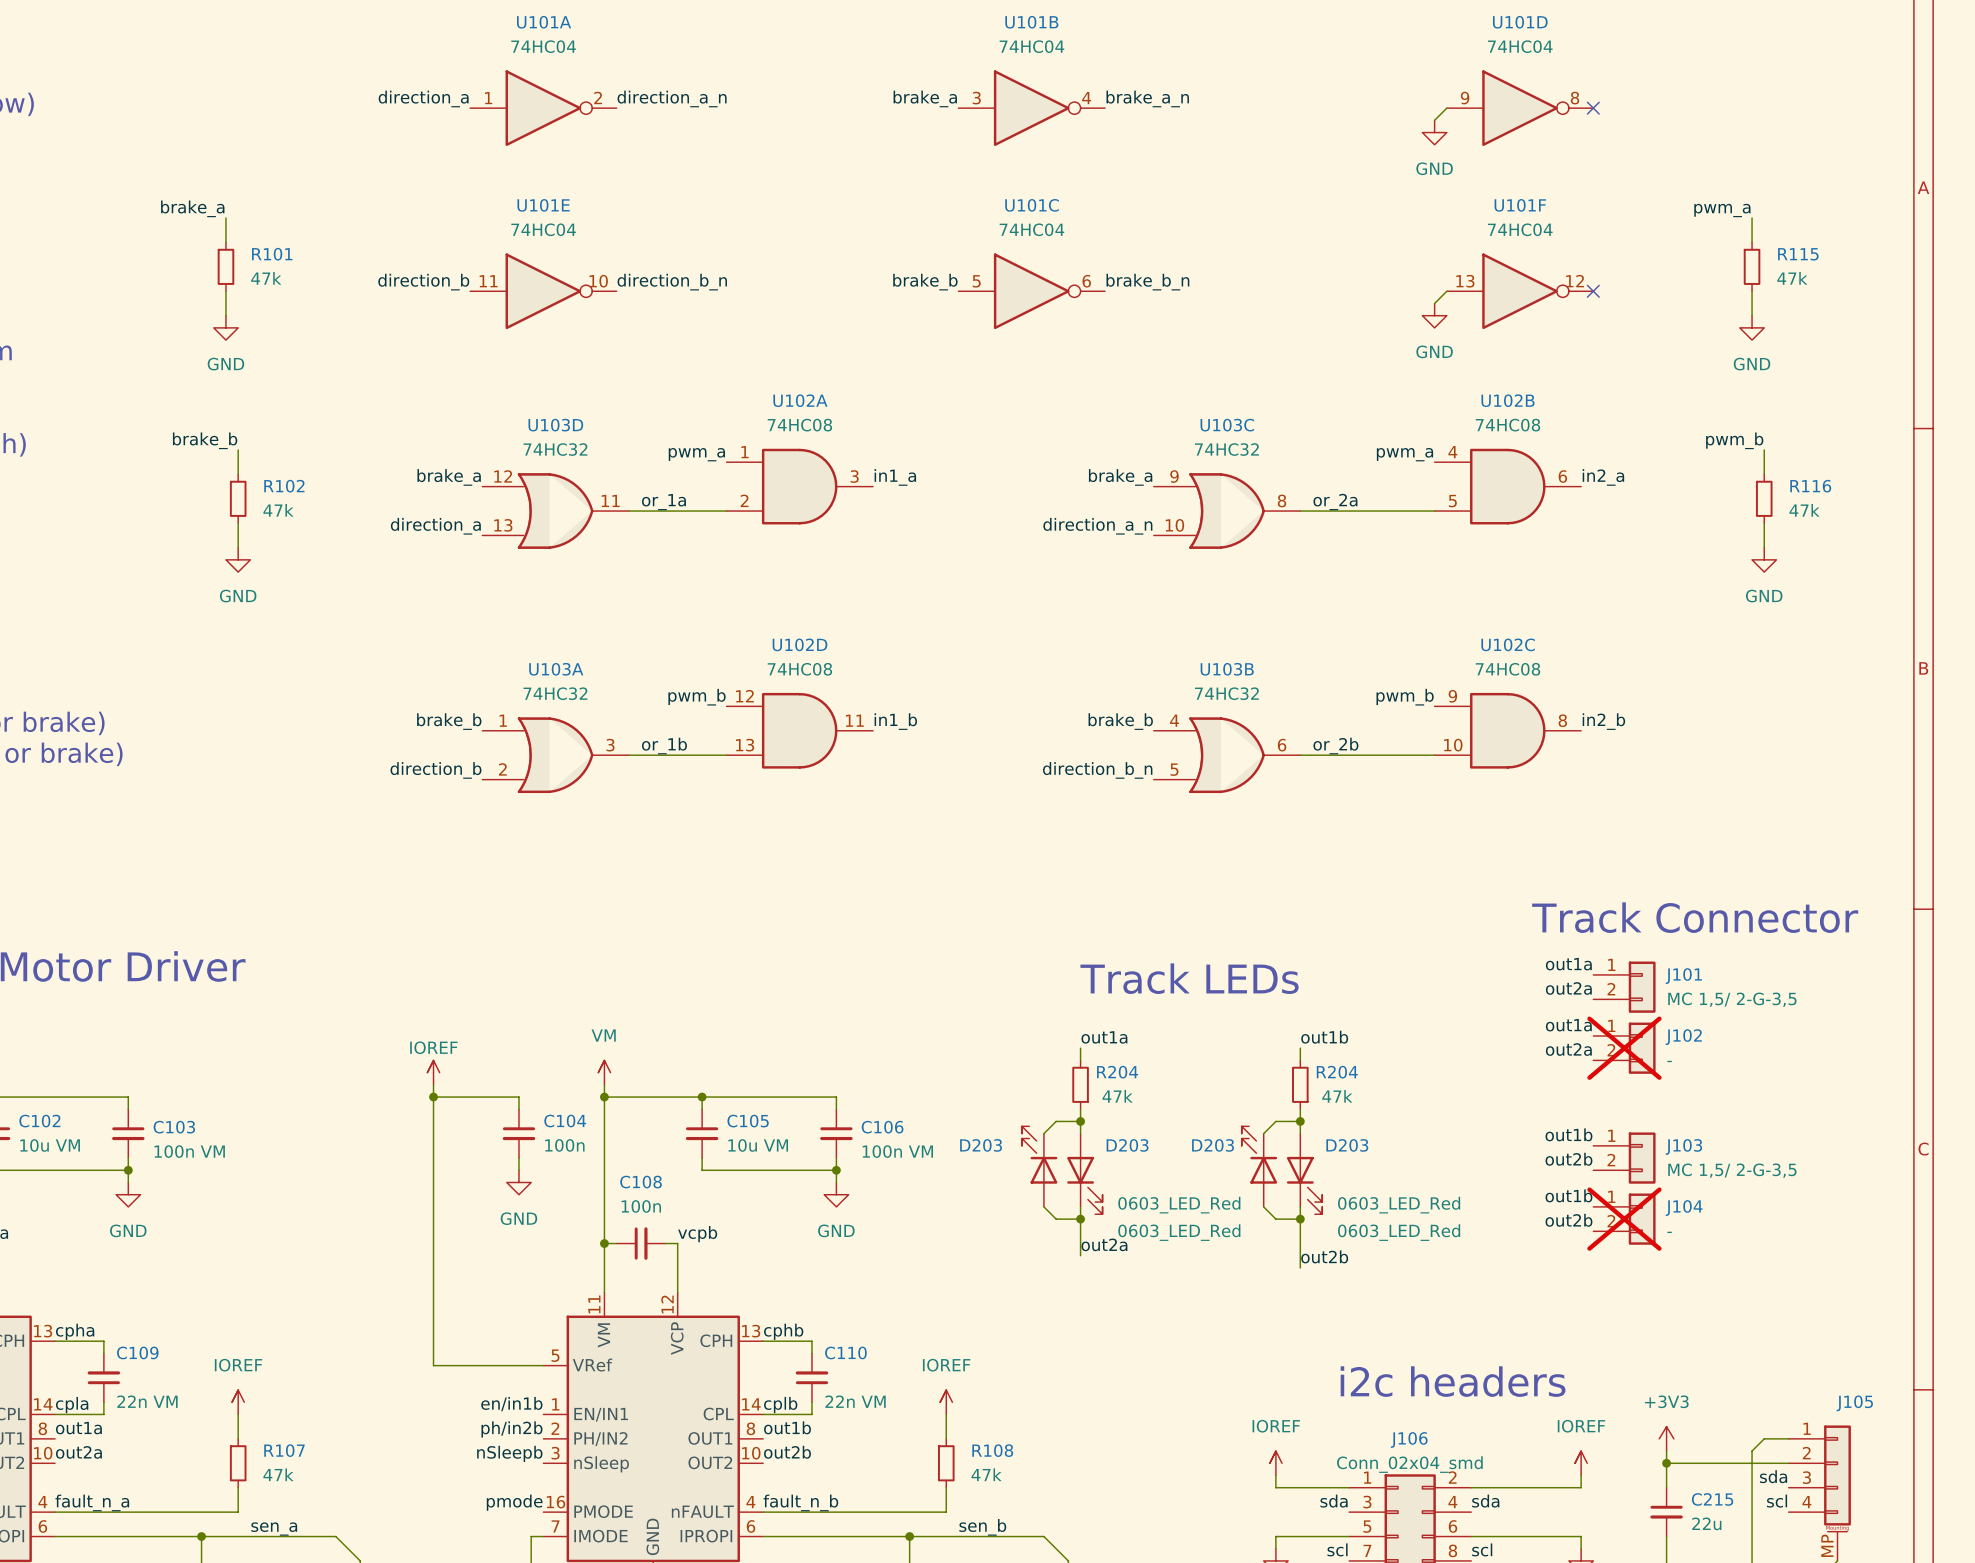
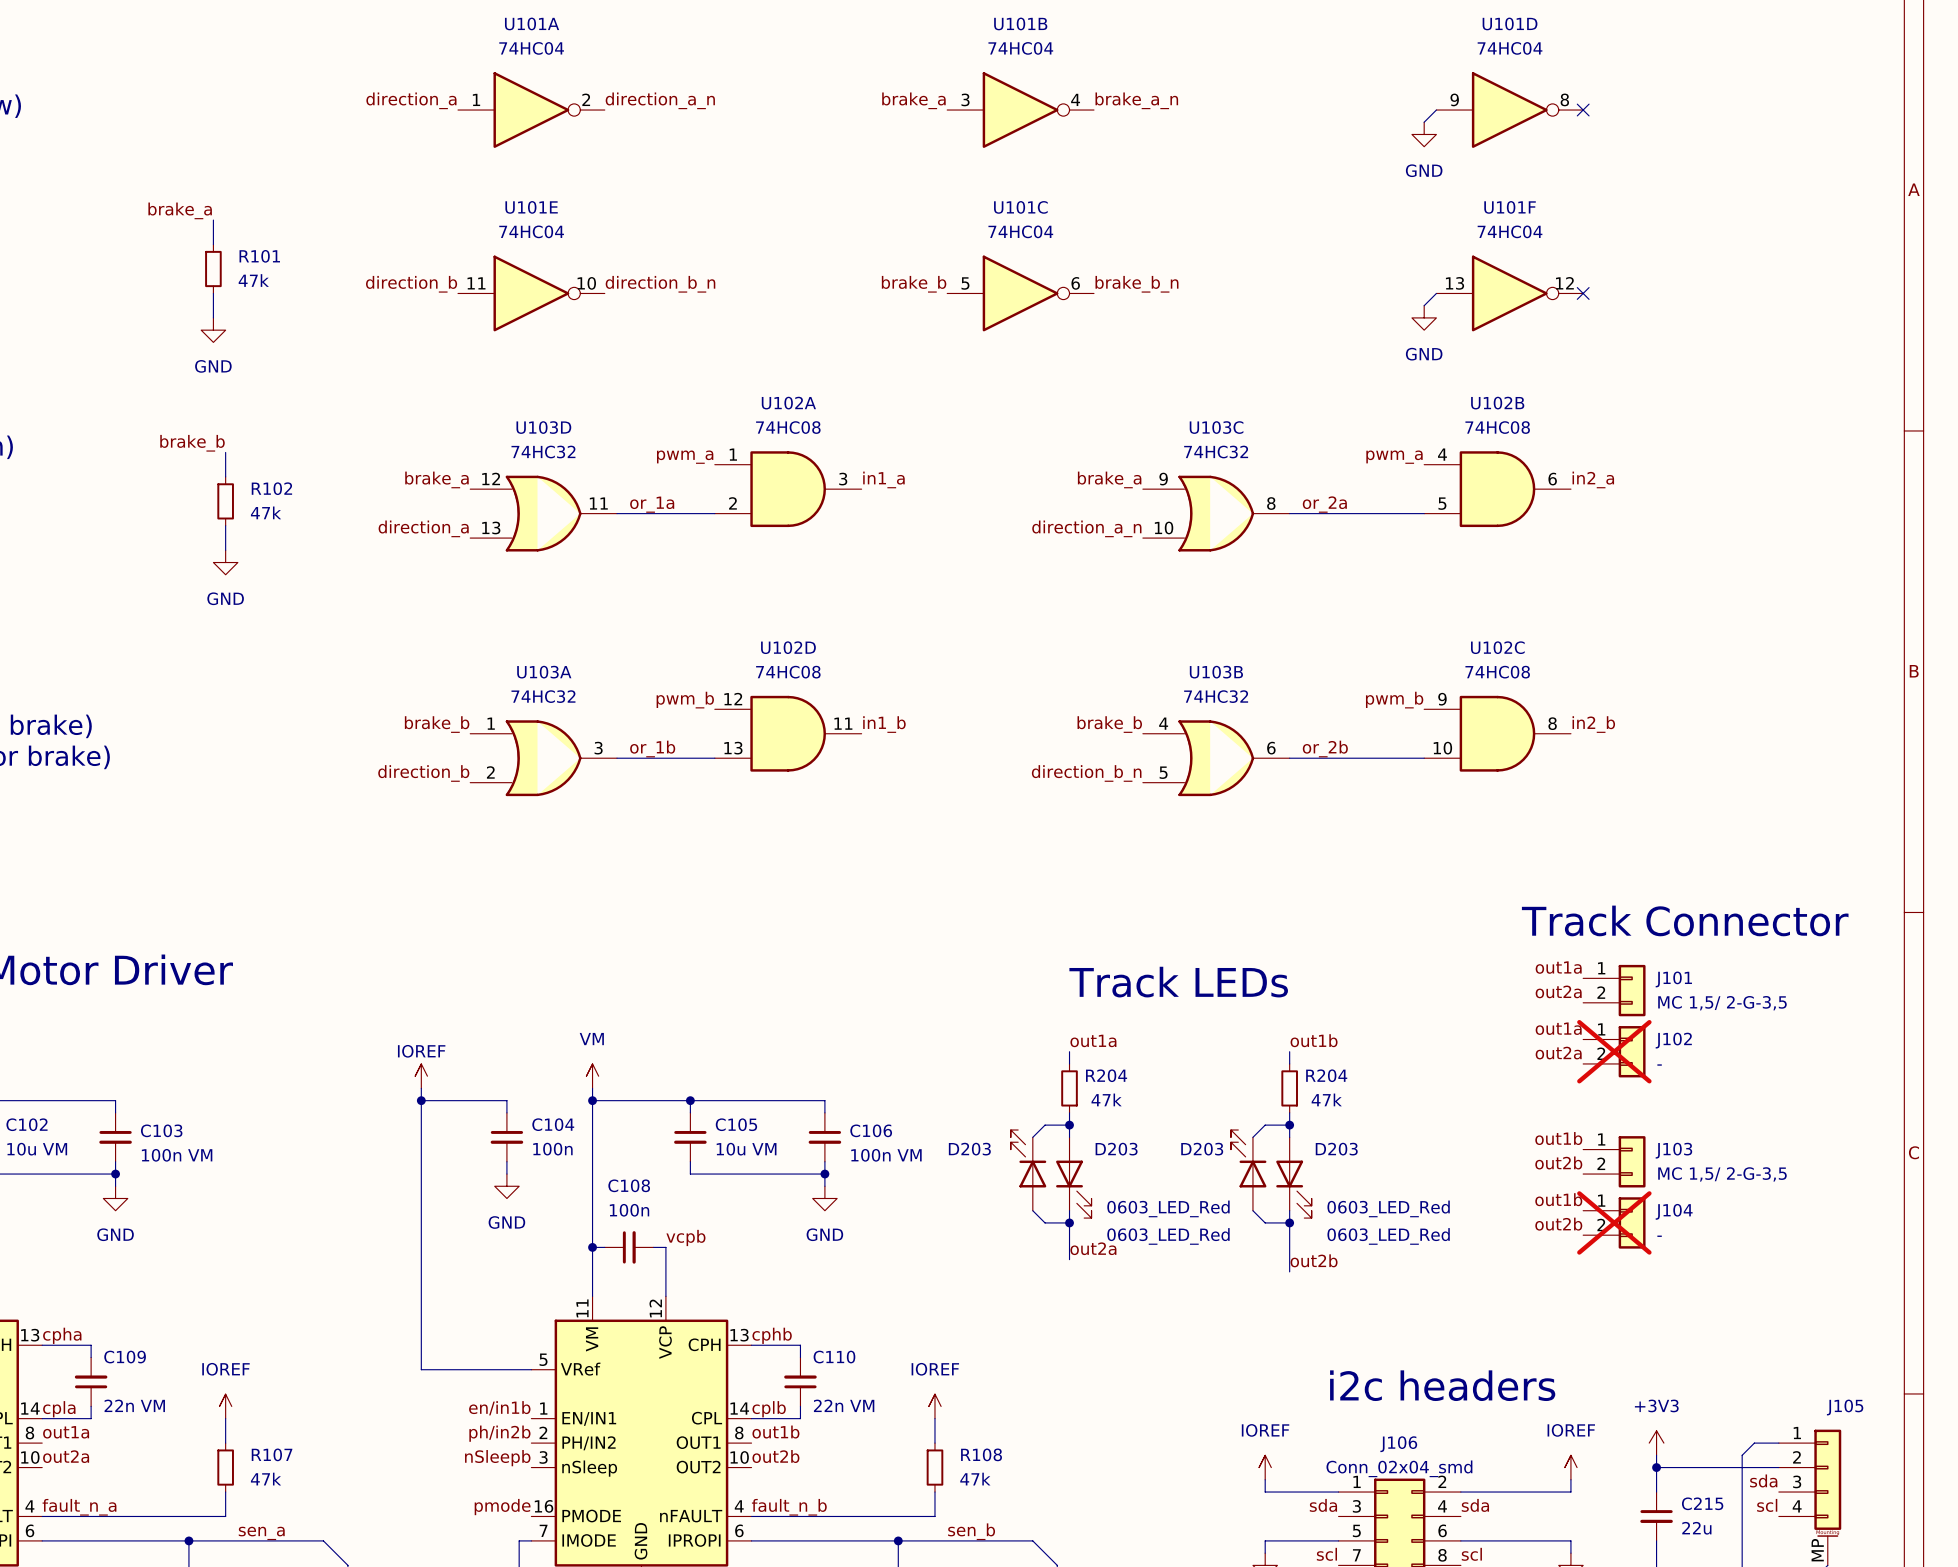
label: pwm_a (1722, 210) -> none
wire: (1752, 218) (1752, 242) -> none
R115: 47k (1752, 266) -> none
wire: (1752, 291) (1752, 315) -> none
power symbol: GND (1752, 327) -> none
label: pwm_b (1734, 440) -> none
wire: (1764, 449) (1764, 474) -> none
R116: 47k (1764, 498) -> none
wire: (1764, 523) (1764, 547) -> none
power symbol: GND (1764, 559) -> none

